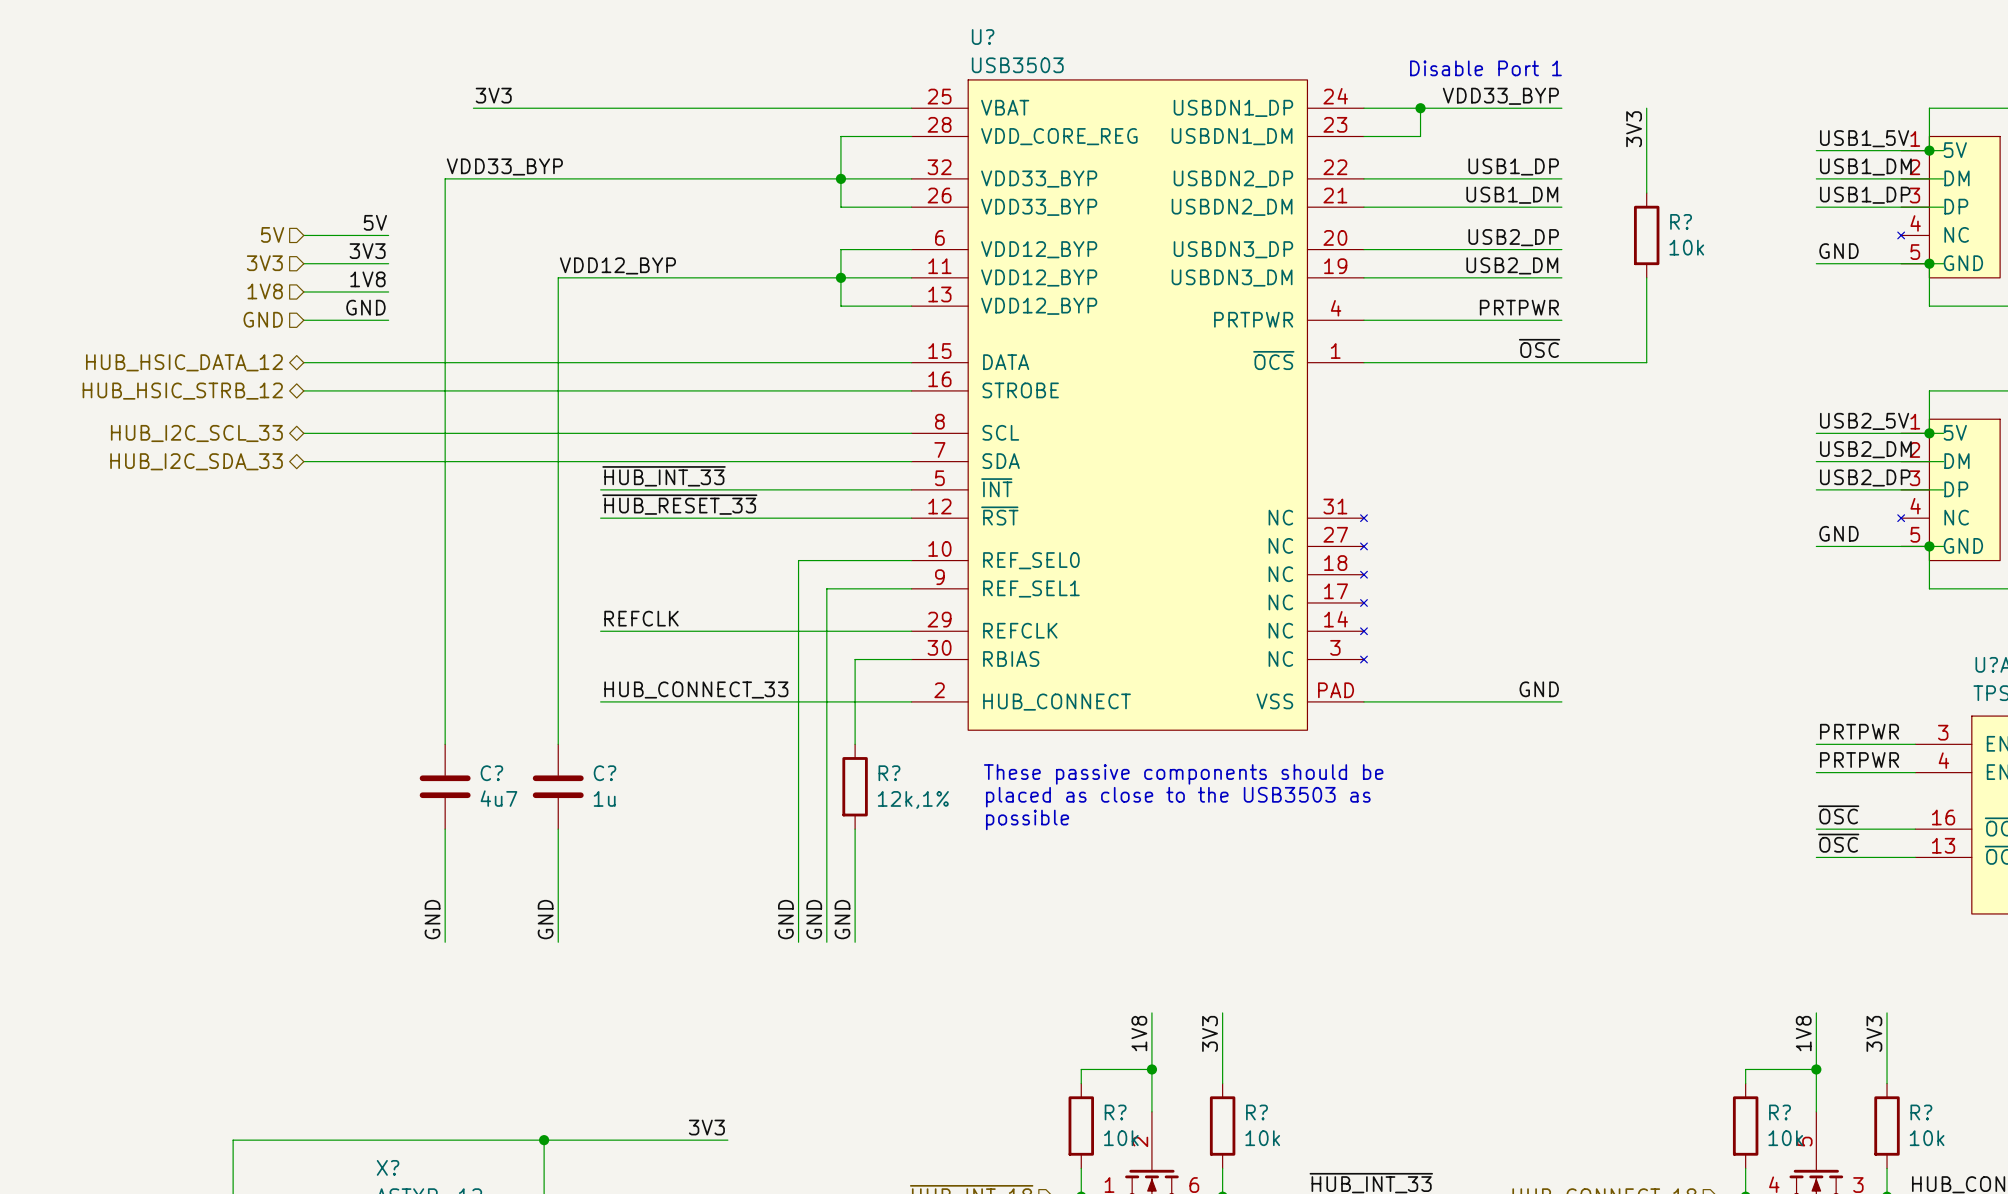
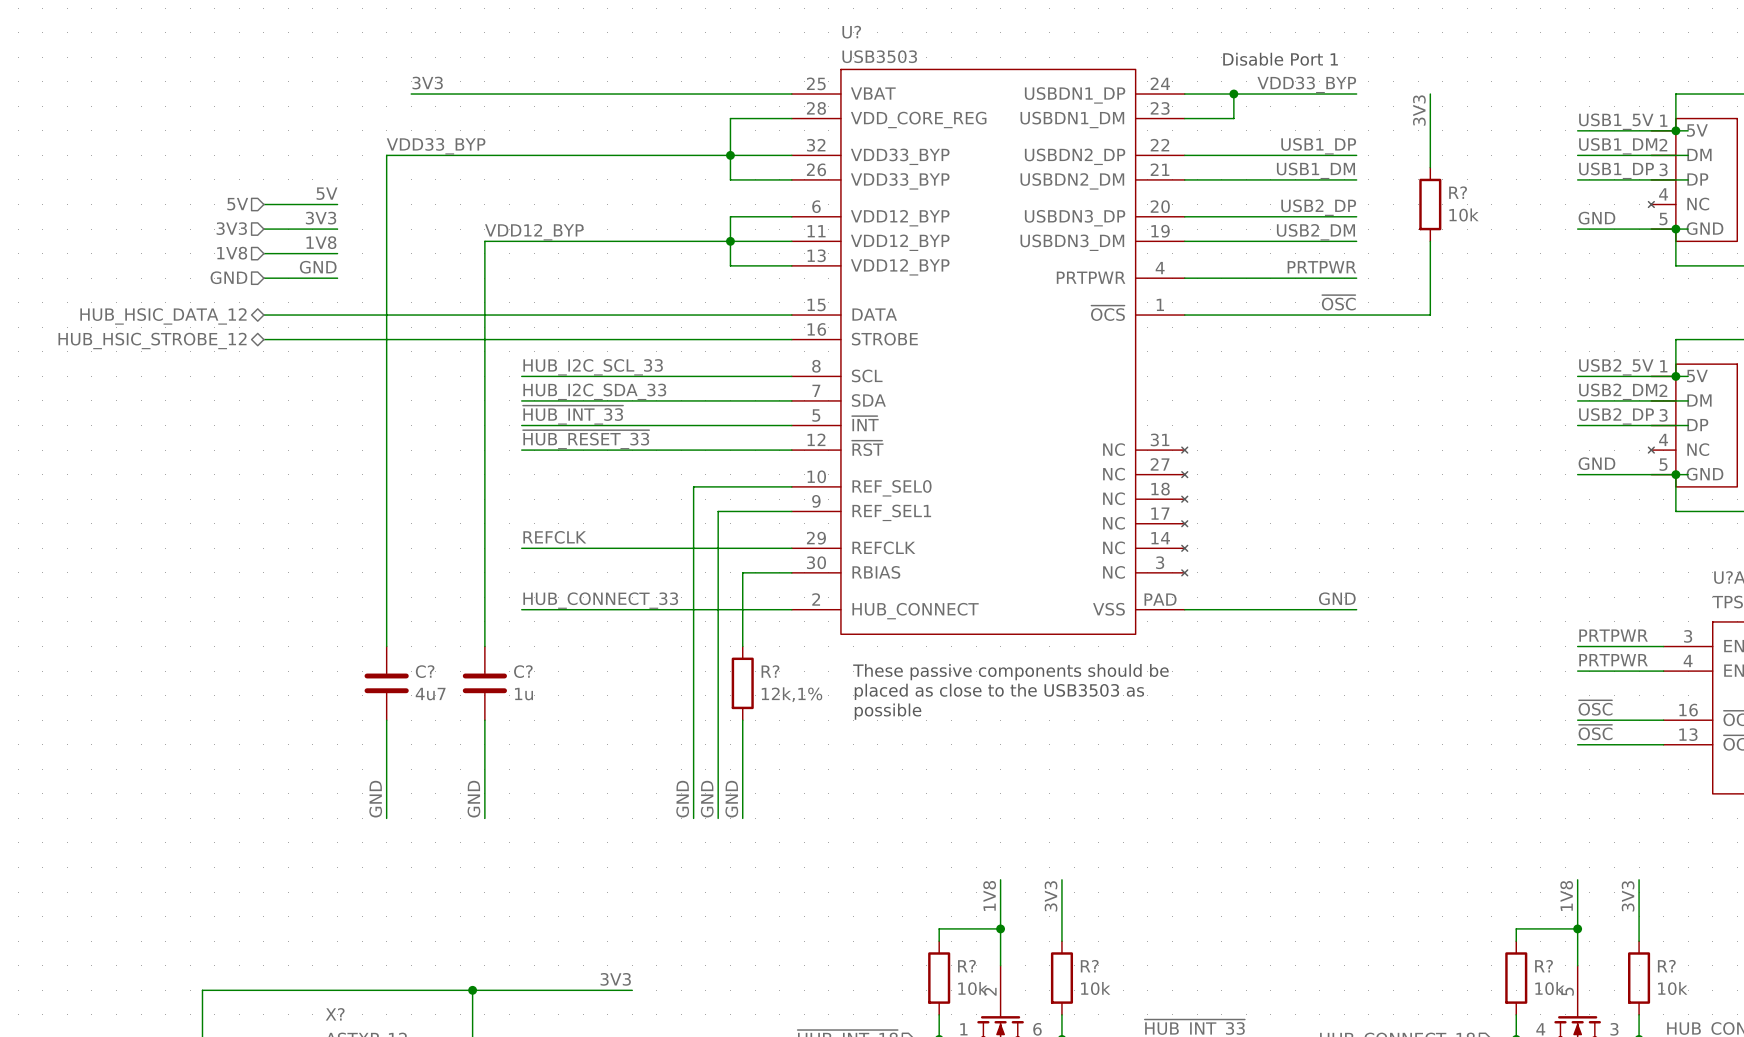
hierarchical label: HUB_HSIC_STRB_12 (182, 391) -> HUB_HSIC_STROBE_12 (152, 340)
label: none -> HUB_I2C_SCL_33 (593, 367)
hierarchical label: HUB_I2C_SCL_33 (196, 433) -> none
wire: (303, 433) (600, 433) -> none
label: none -> HUB_I2C_SDA_33 (594, 391)
hierarchical label: HUB_I2C_SDA_33 (196, 461) -> none
wire: (303, 461) (600, 461) -> none

